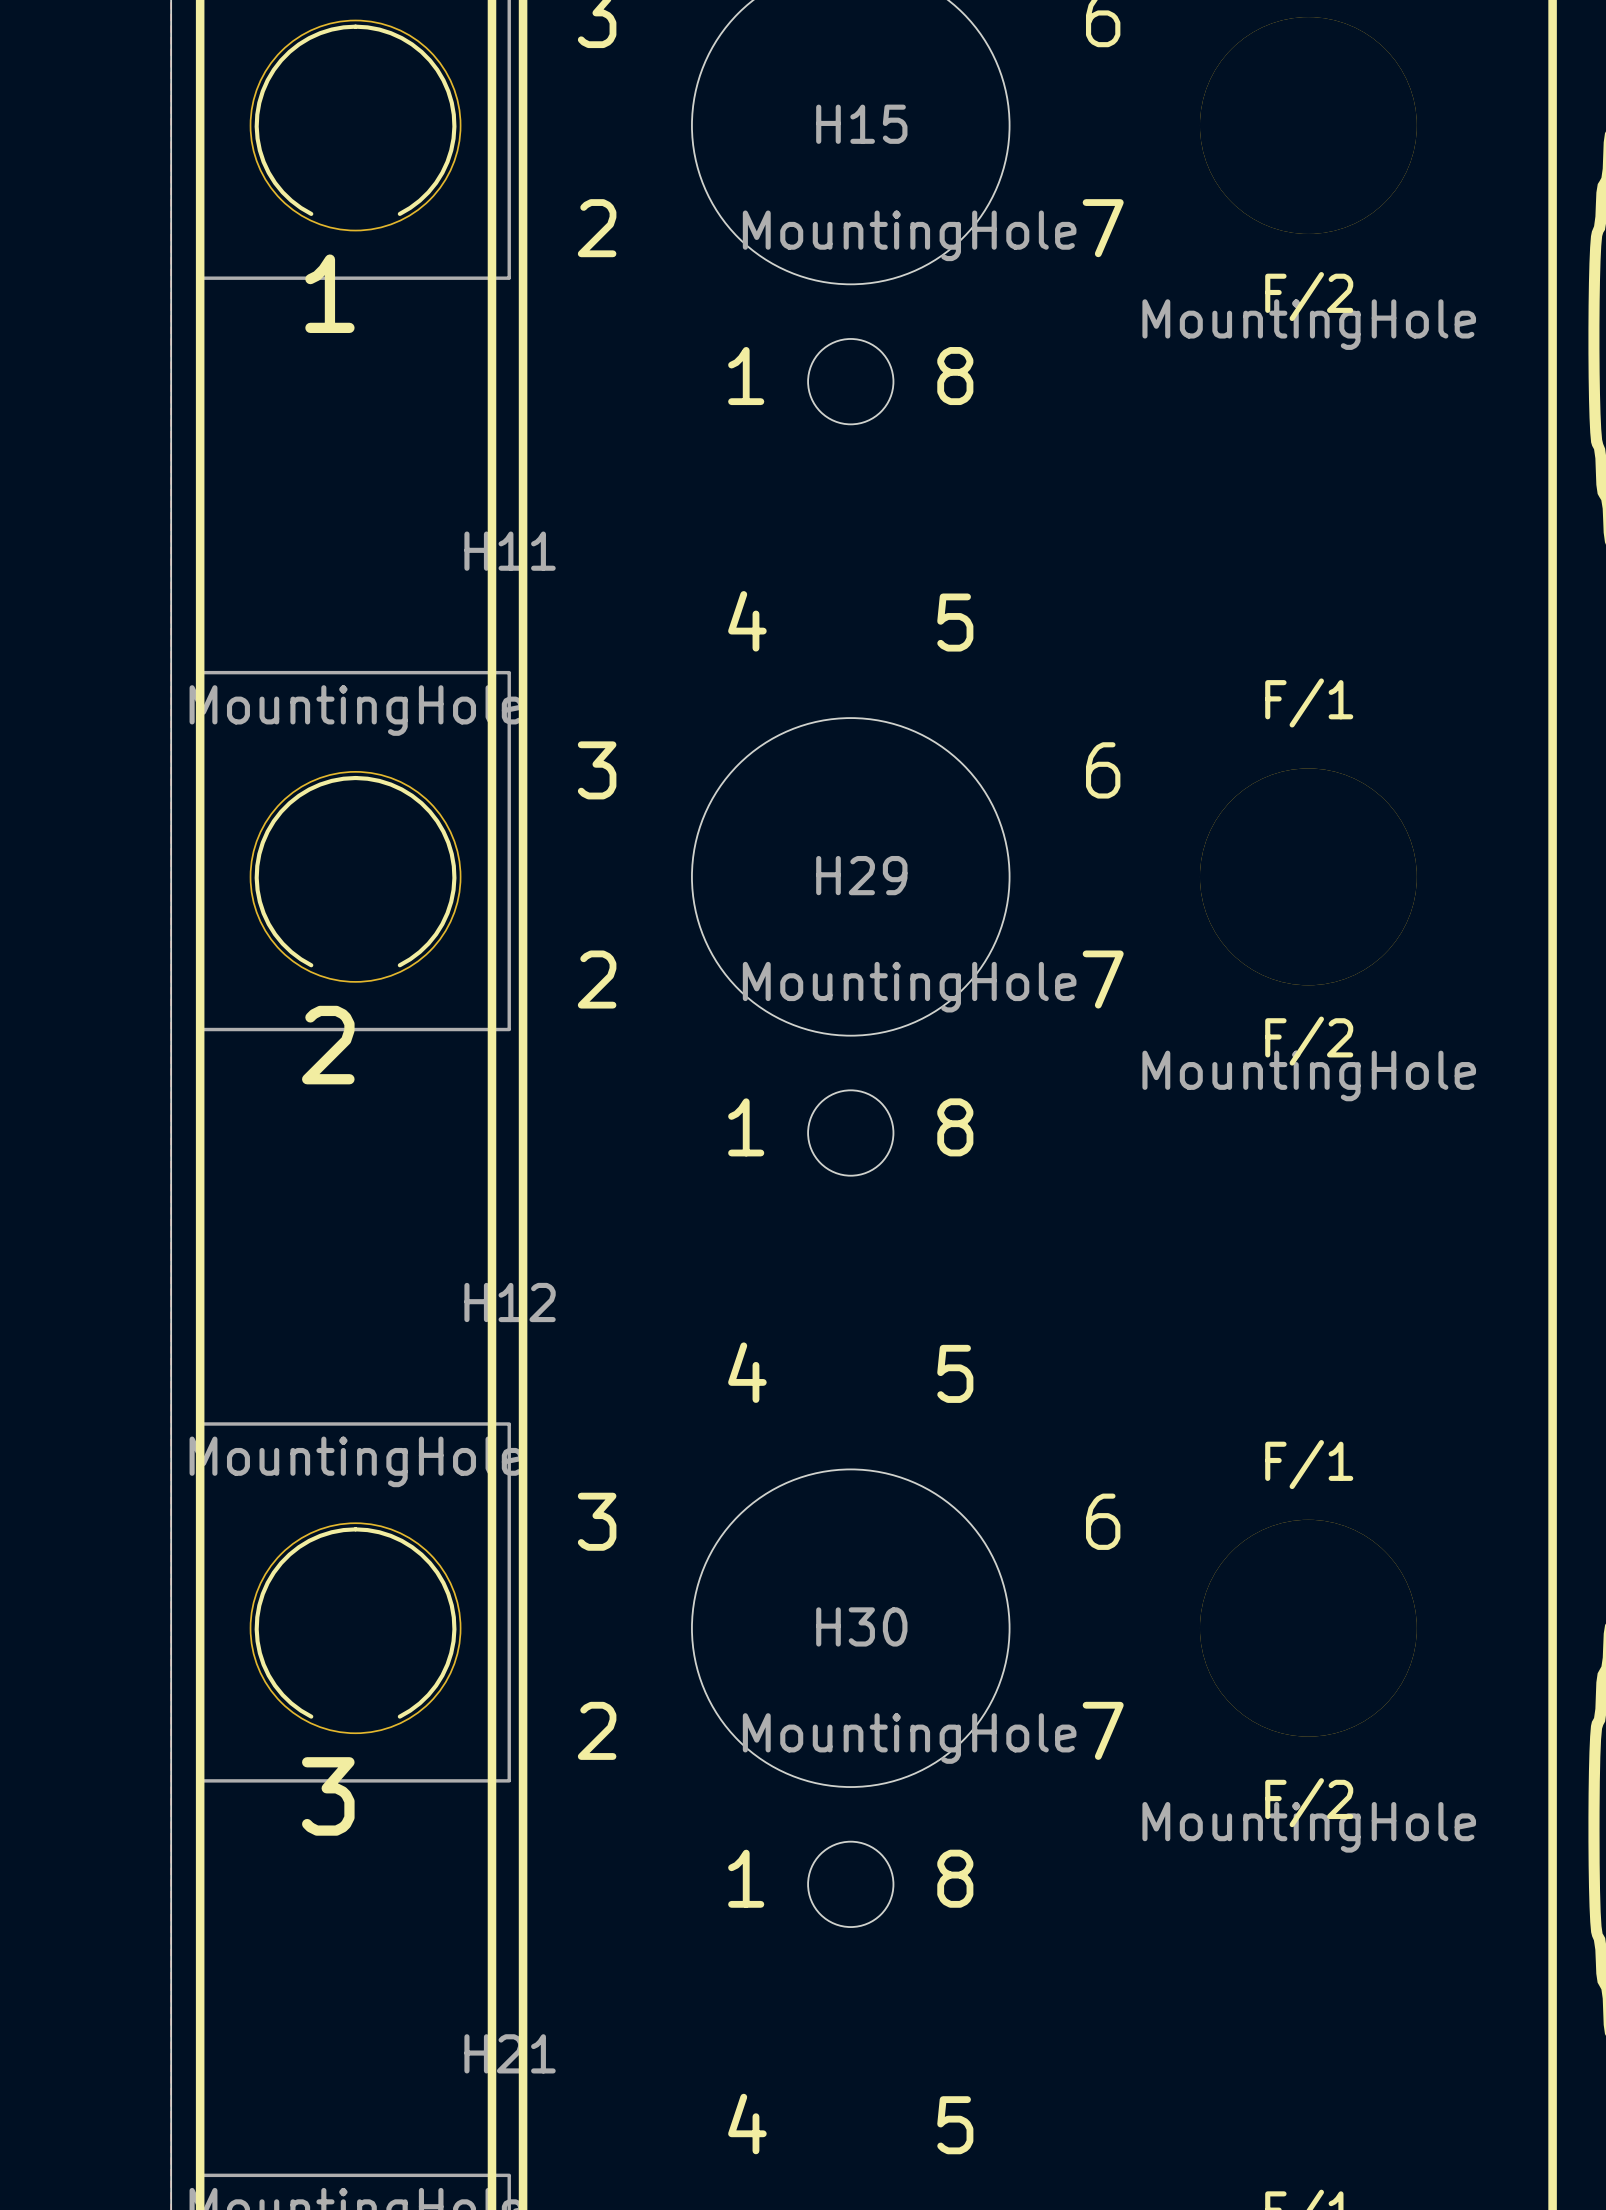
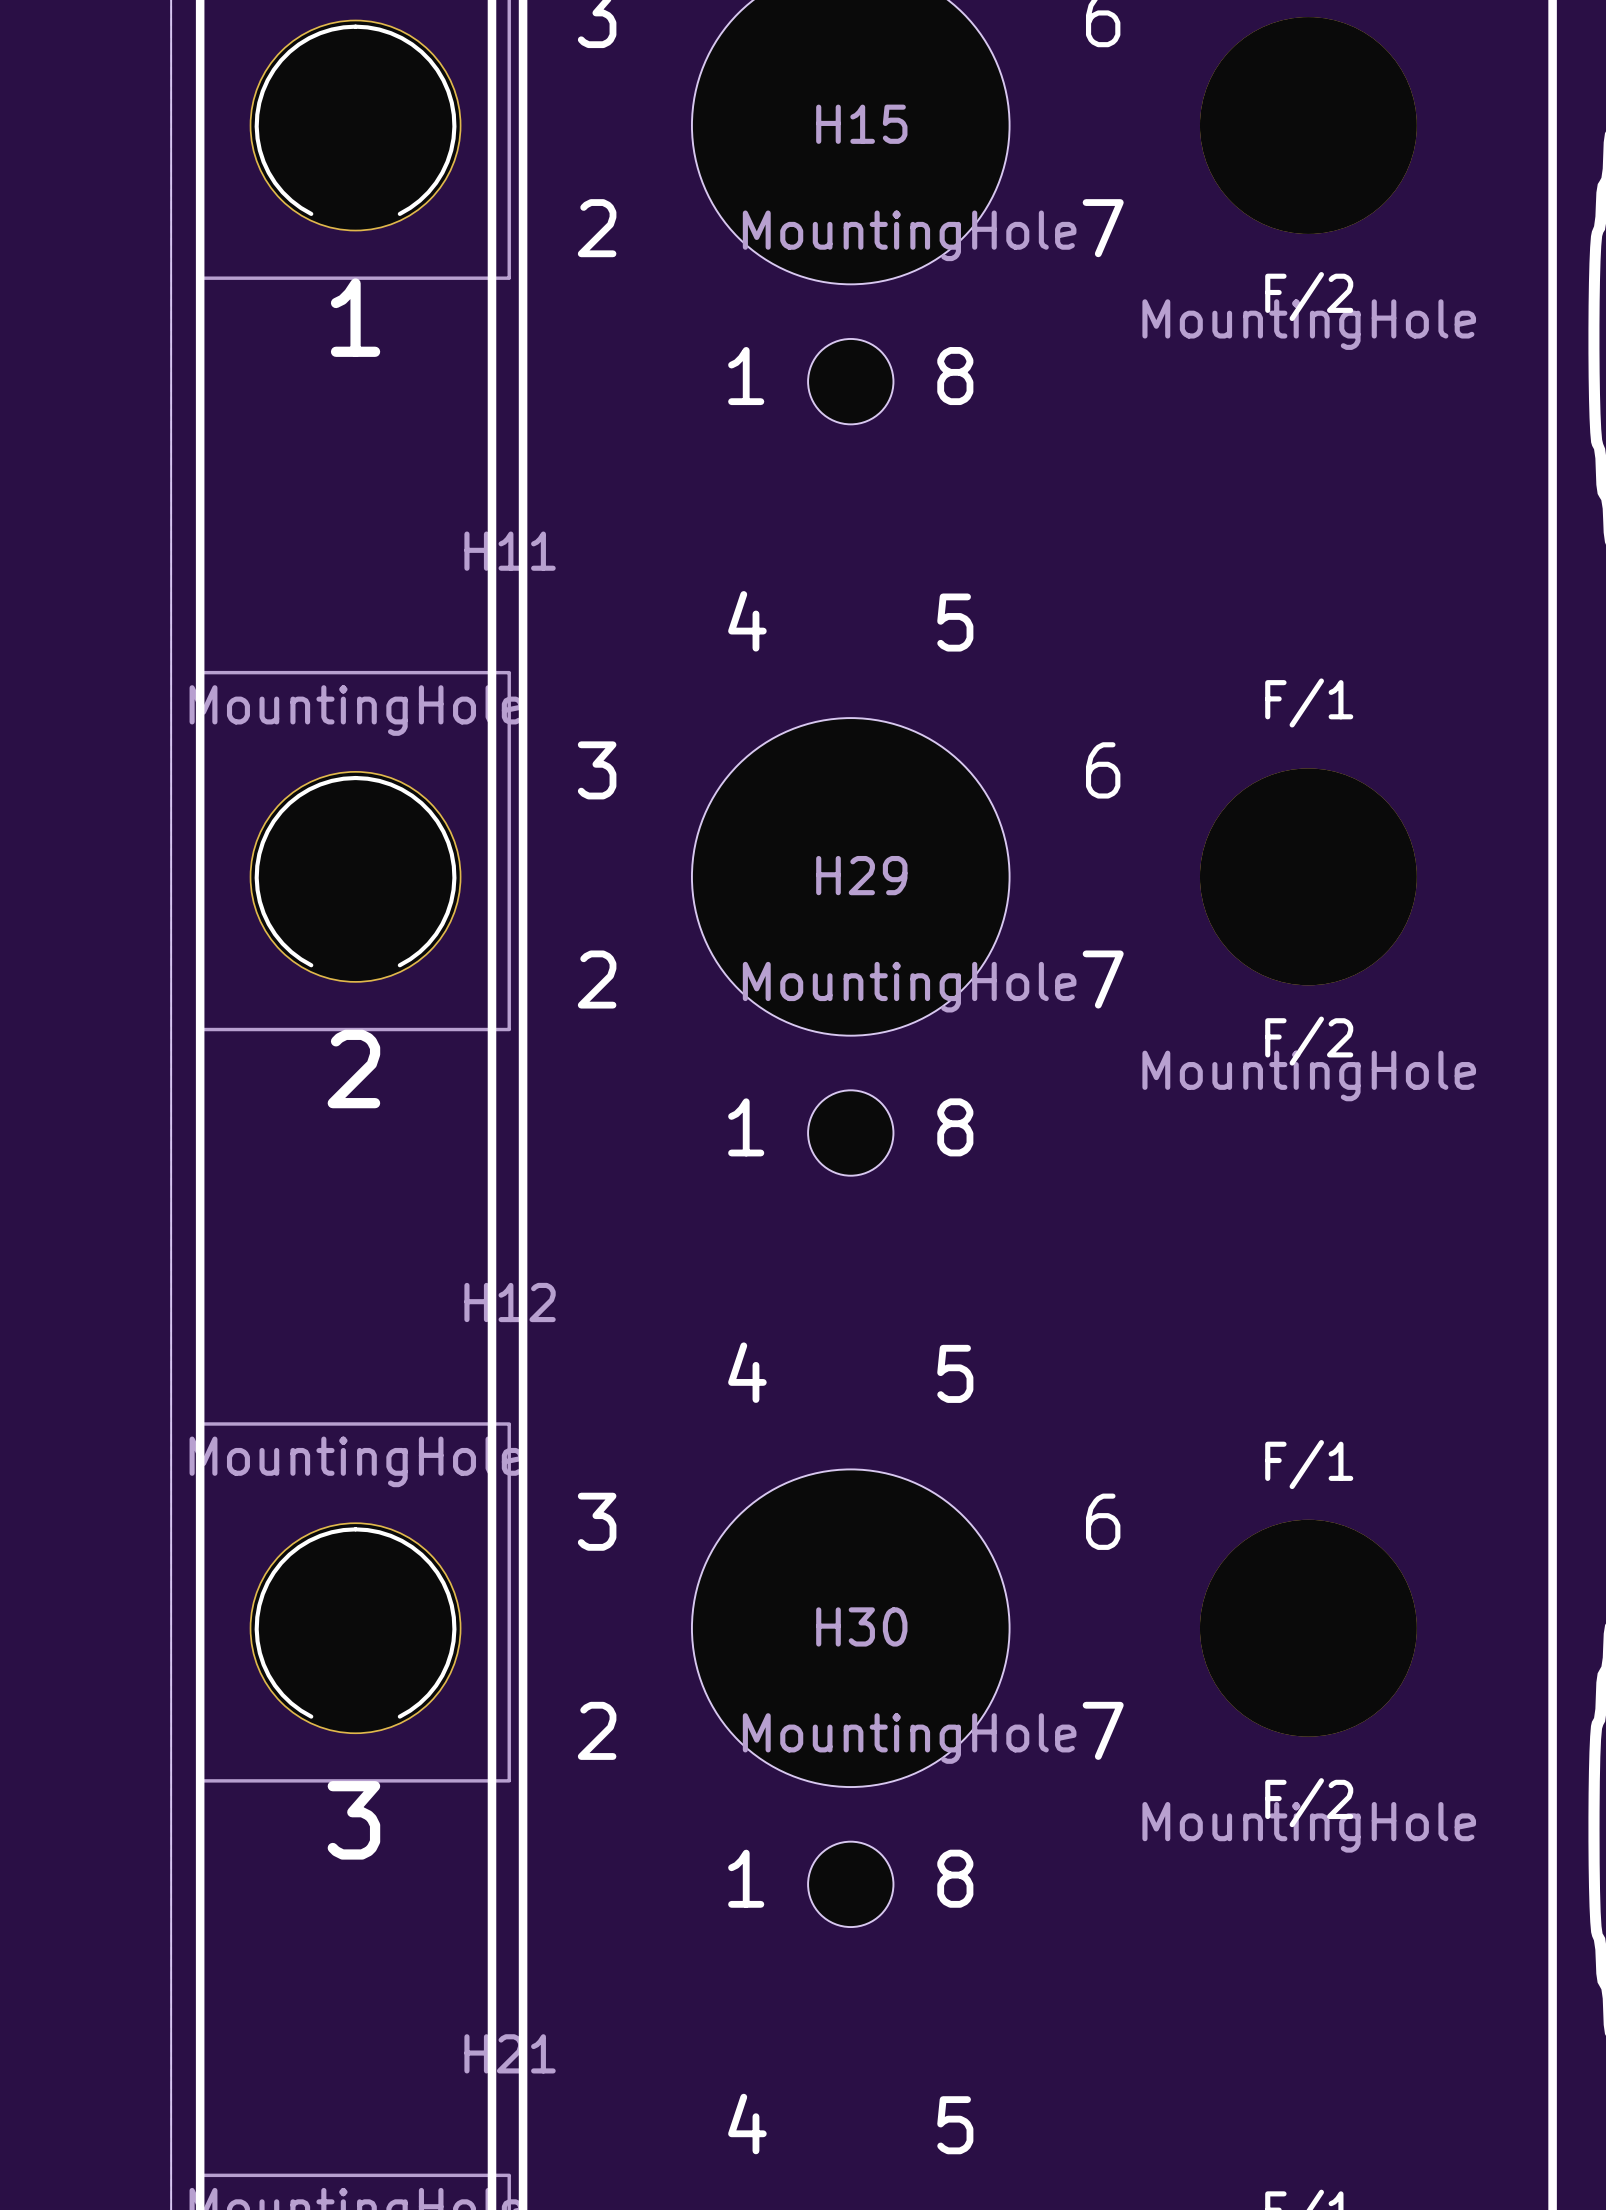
text position: 1 (329, 293) -> 1 (355, 317)
text position: 2 (328, 1045) -> 2 (353, 1068)
text position: 3 (328, 1796) -> 3 (353, 1820)

